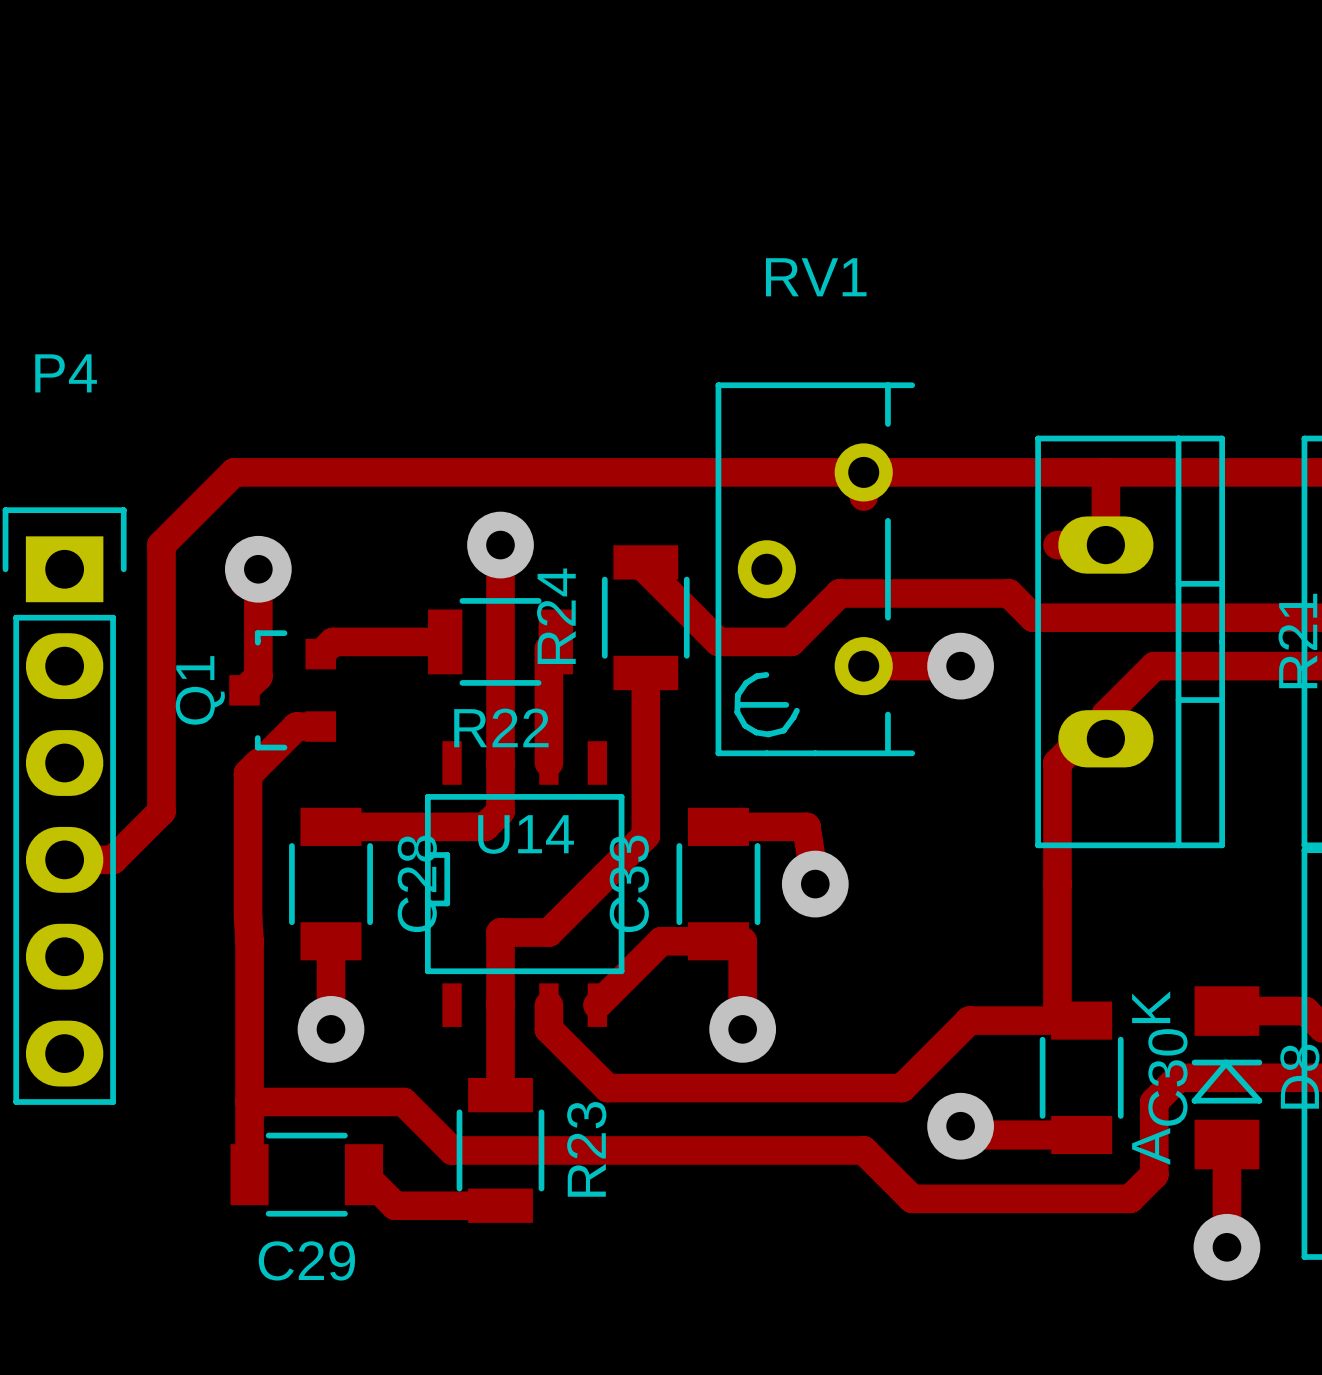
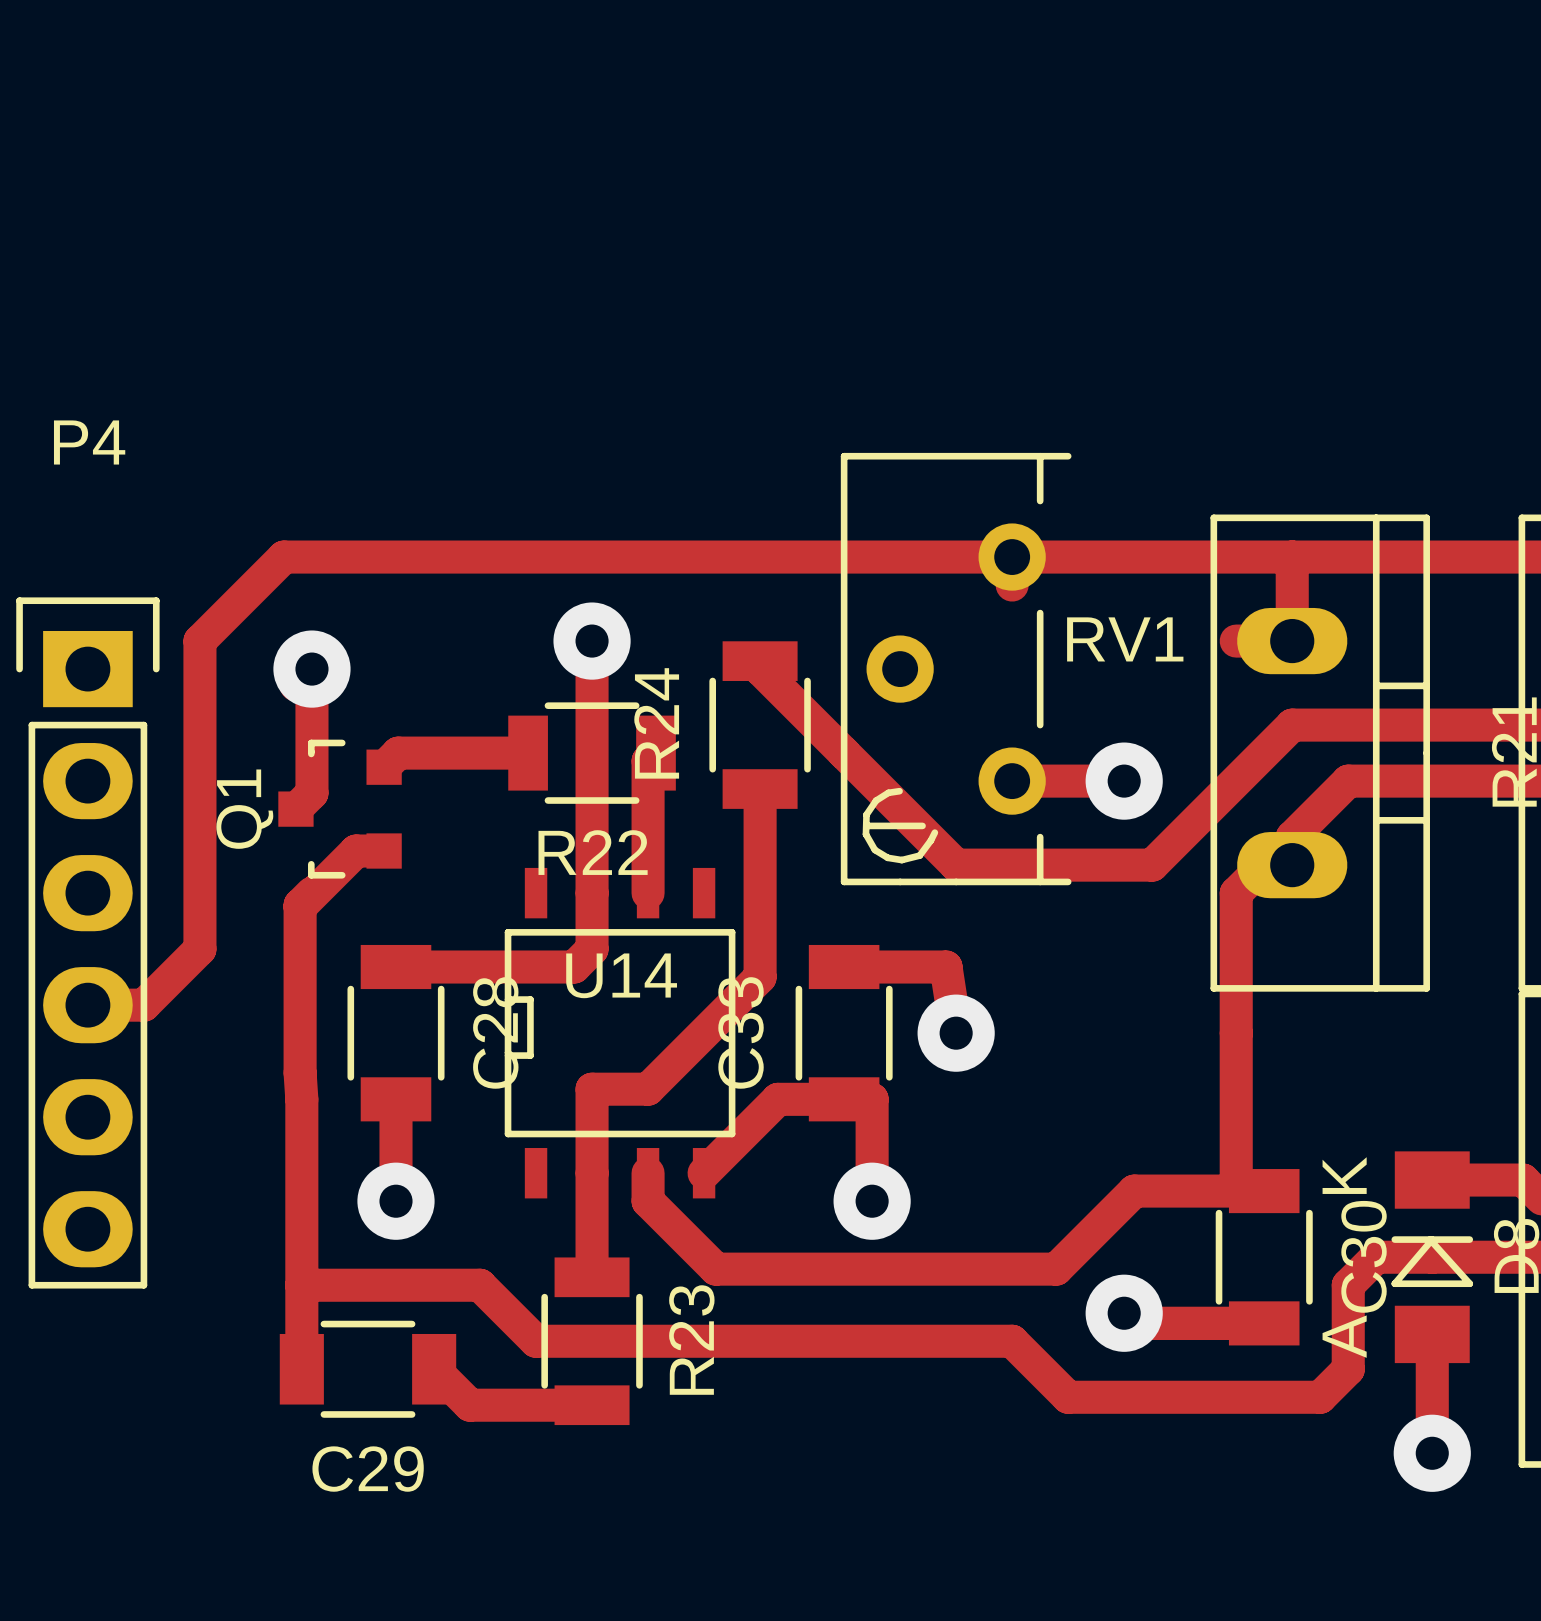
RV1 name position: RV1 (816, 277) -> RV1 (1125, 639)
track: (1105, 617) (1033, 617) (1009, 593) (839, 593) (791, 641) (718, 641) -> (1292, 725) (1152, 865) (956, 865) (844, 753)

